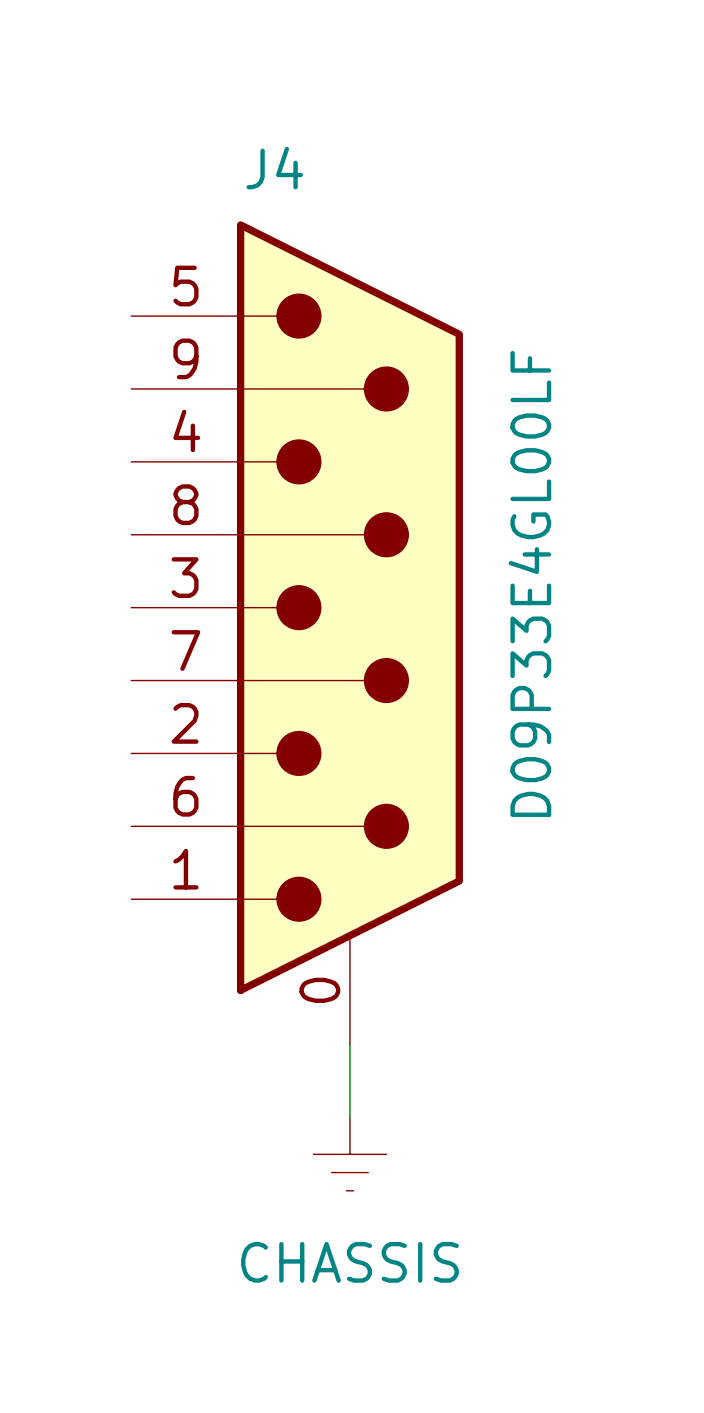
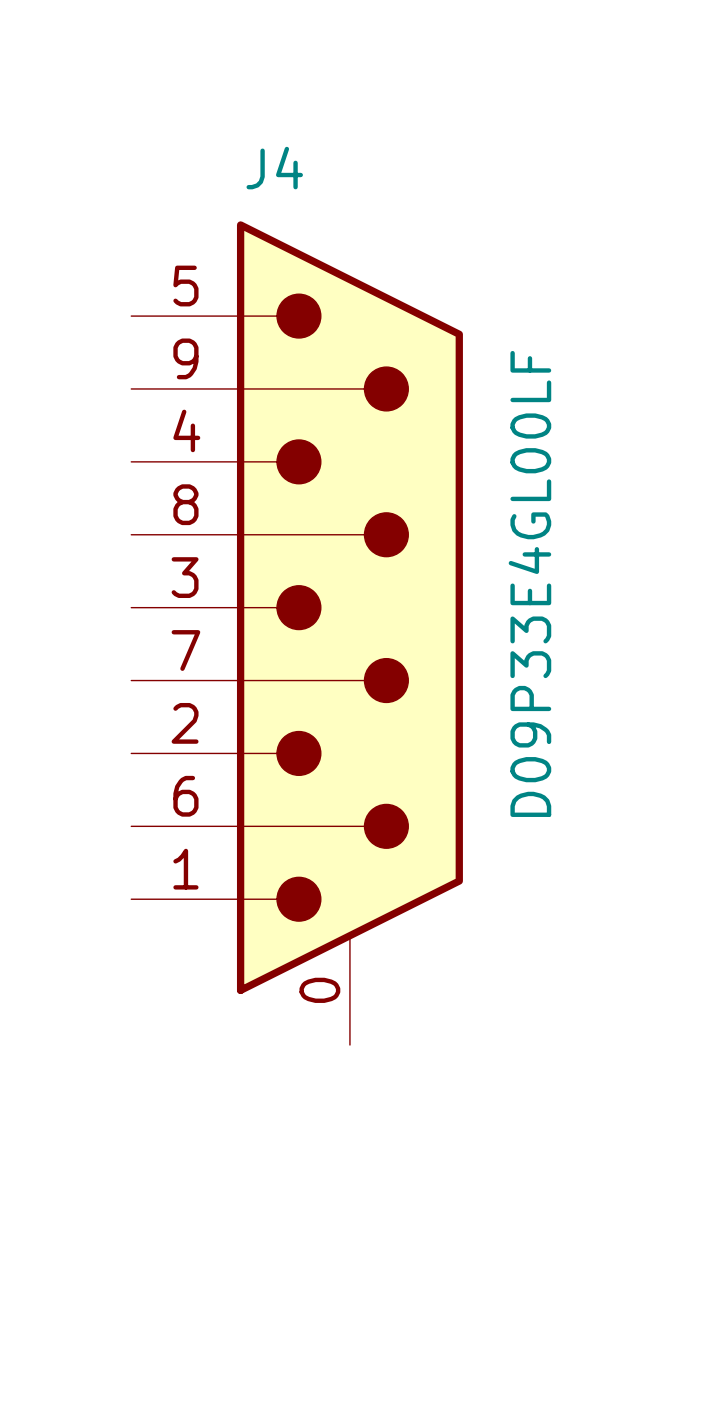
wire: (349, 1045) (349, 1117) -> none
power symbol: CHASSIS (349, 1154) -> none

